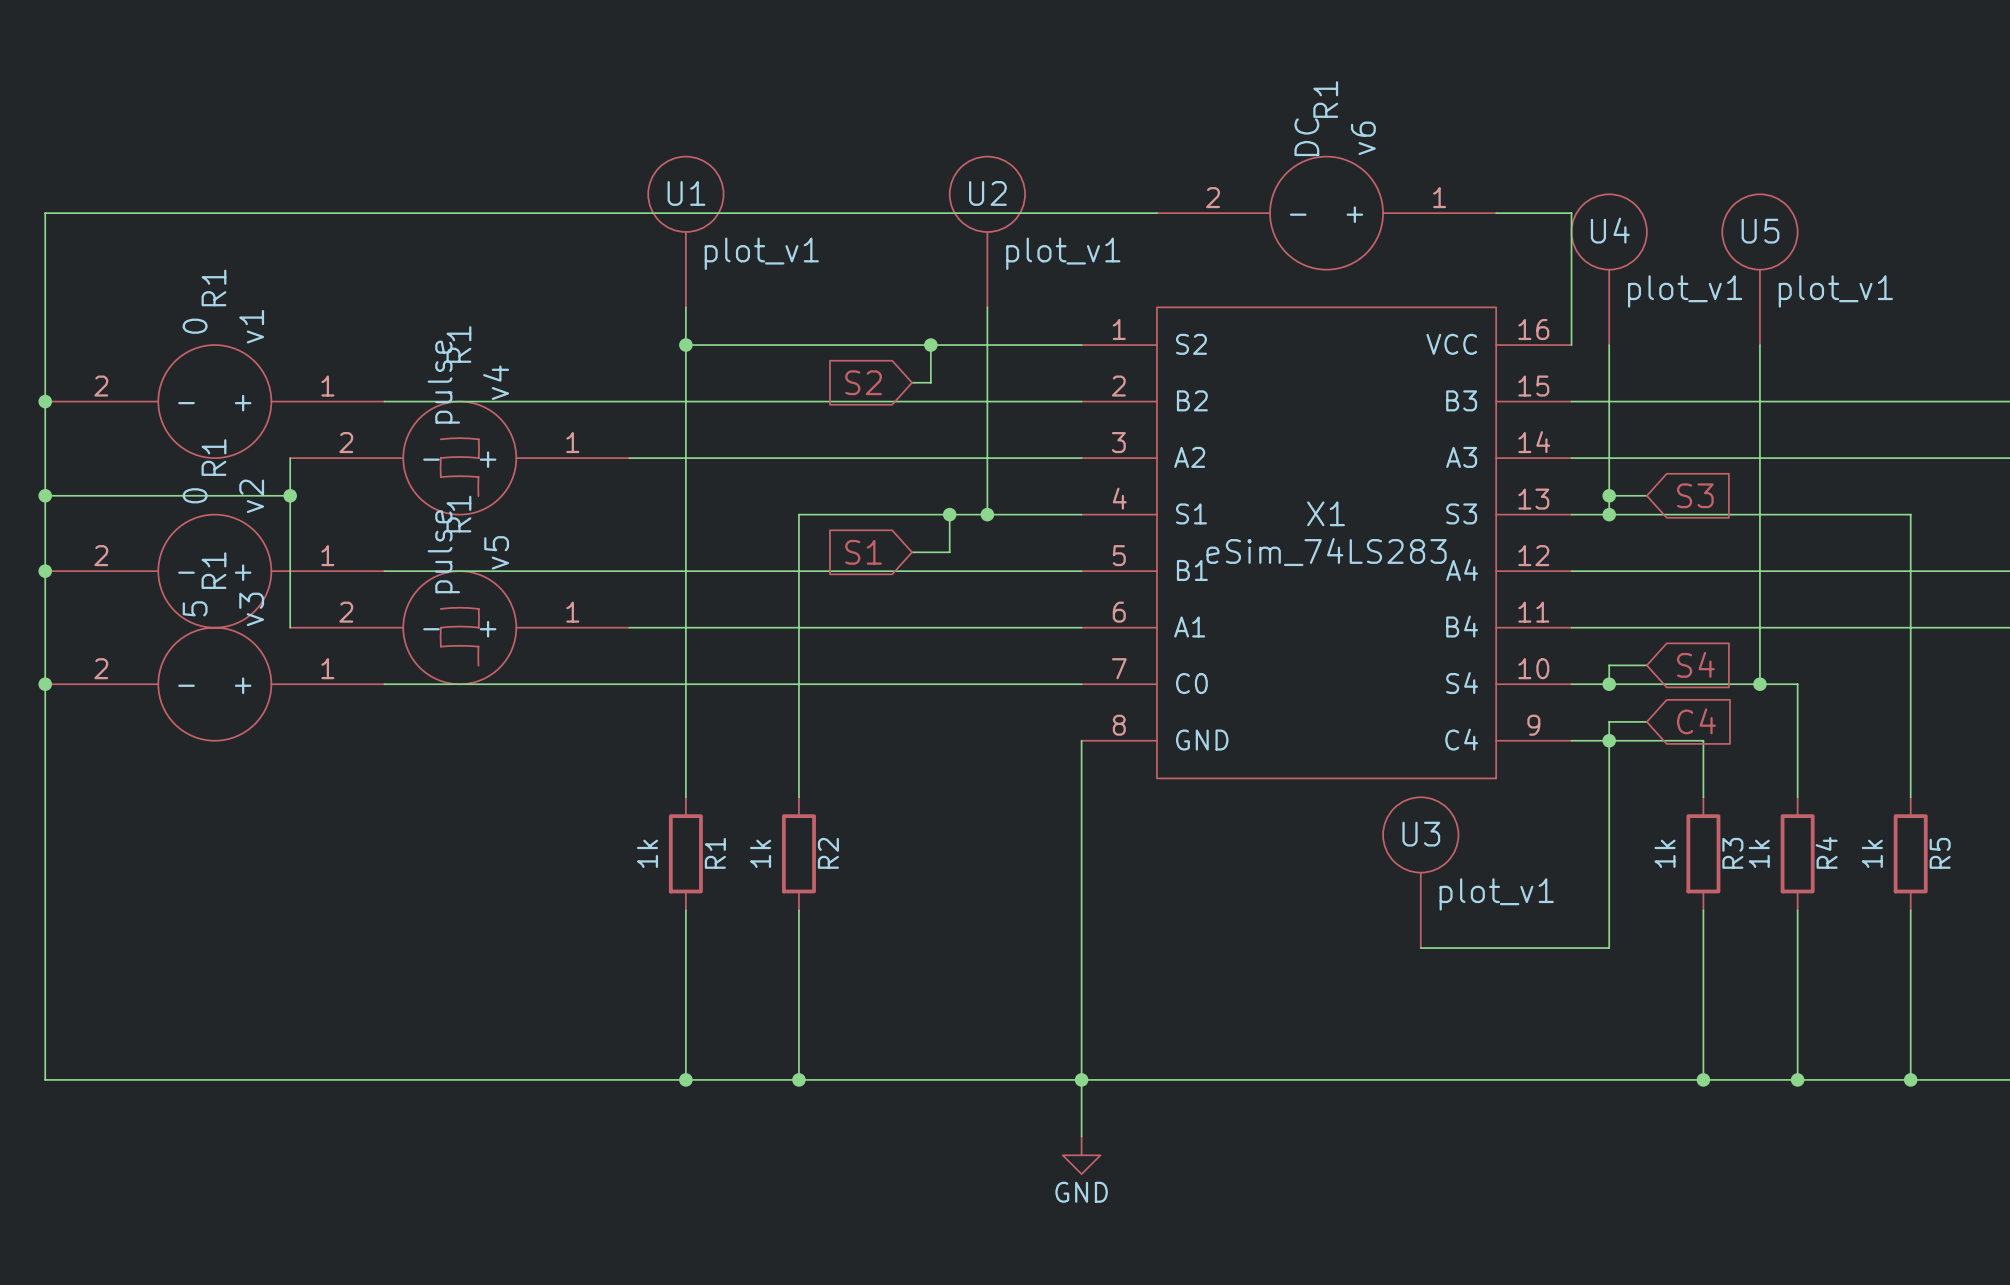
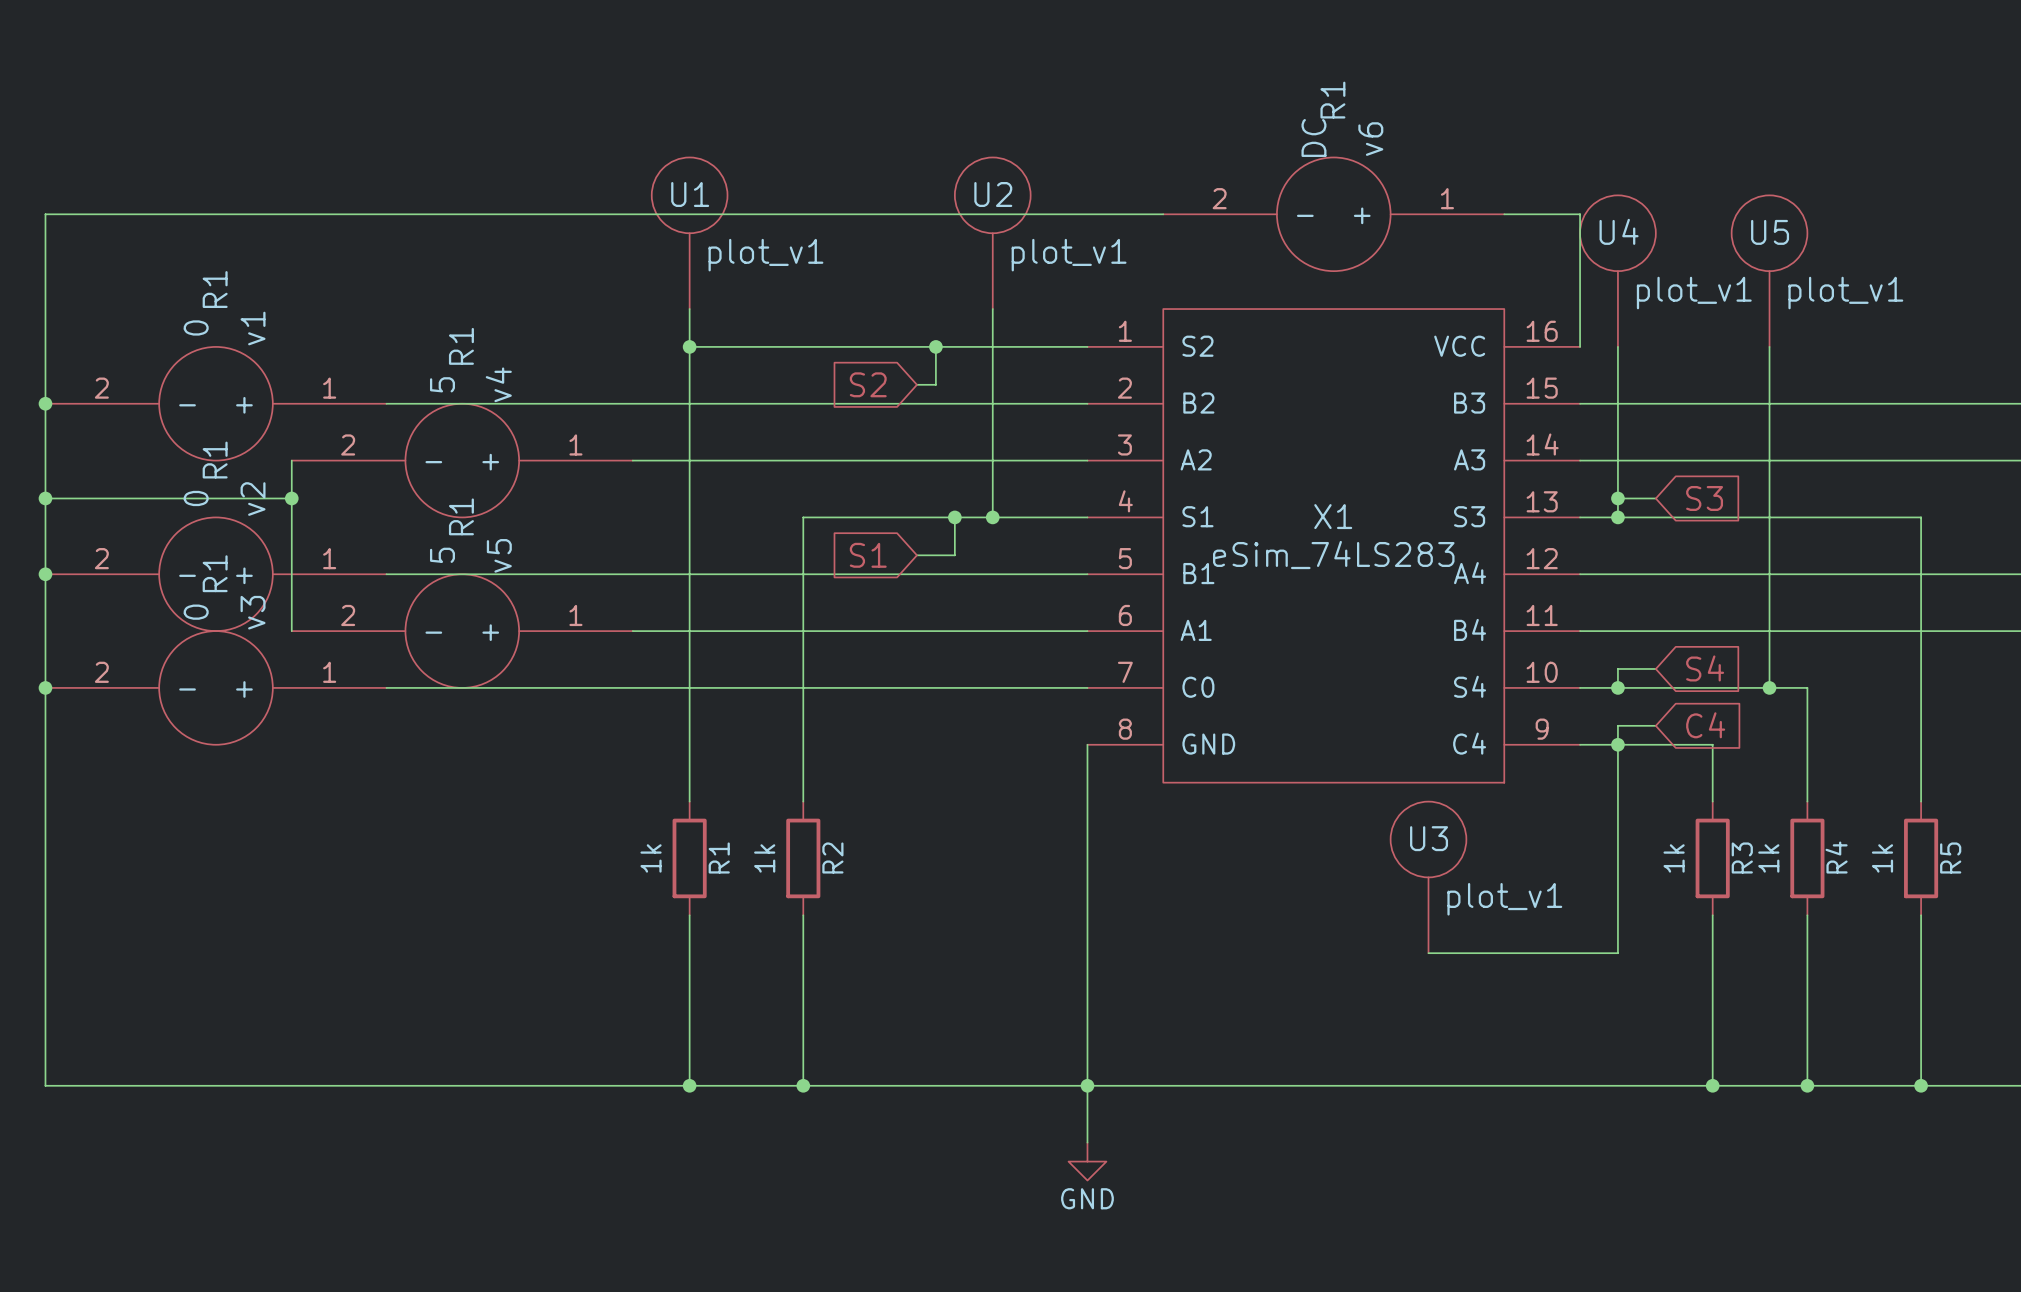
v4 value: pulse (443, 382) -> 5 (442, 384)
v4 symbol: [290, 401, 630, 515] -> [291, 403, 633, 518]
v5 value: pulse (443, 551) -> 5 (442, 555)
v5 symbol: [290, 571, 630, 685] -> [291, 574, 633, 688]
v3 value: 5 (195, 608) -> 0 (196, 612)

